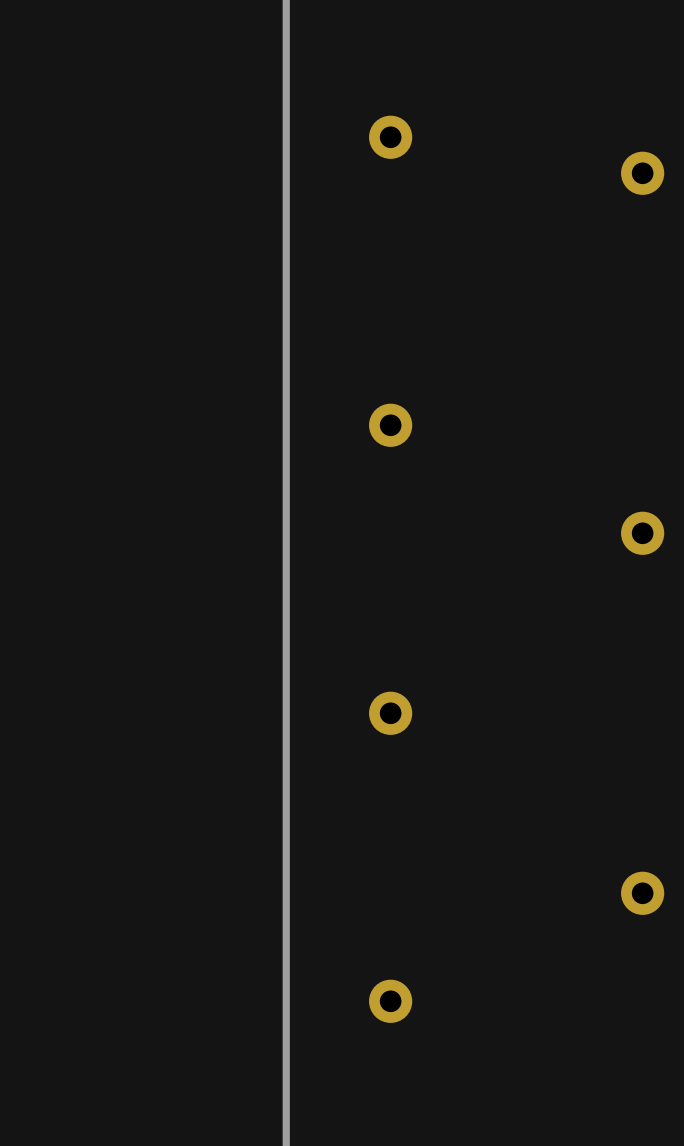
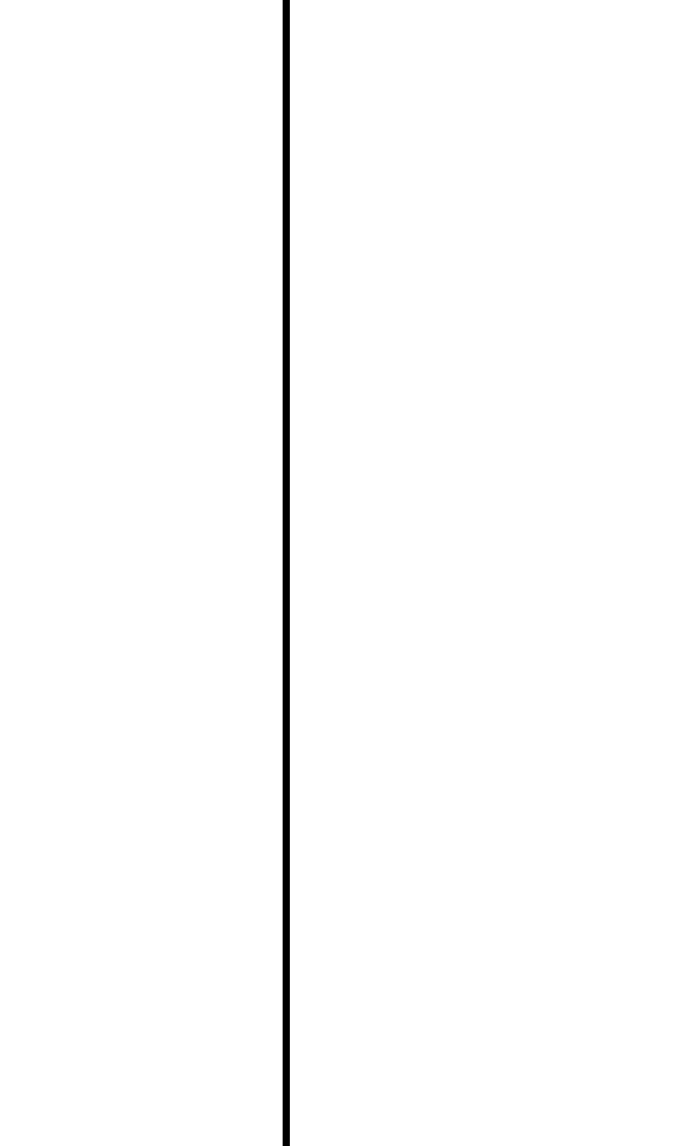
via: (390, 137) -> none
via: (642, 173) -> none
via: (390, 425) -> none
via: (642, 533) -> none
via: (390, 713) -> none
via: (642, 893) -> none
via: (390, 1001) -> none

